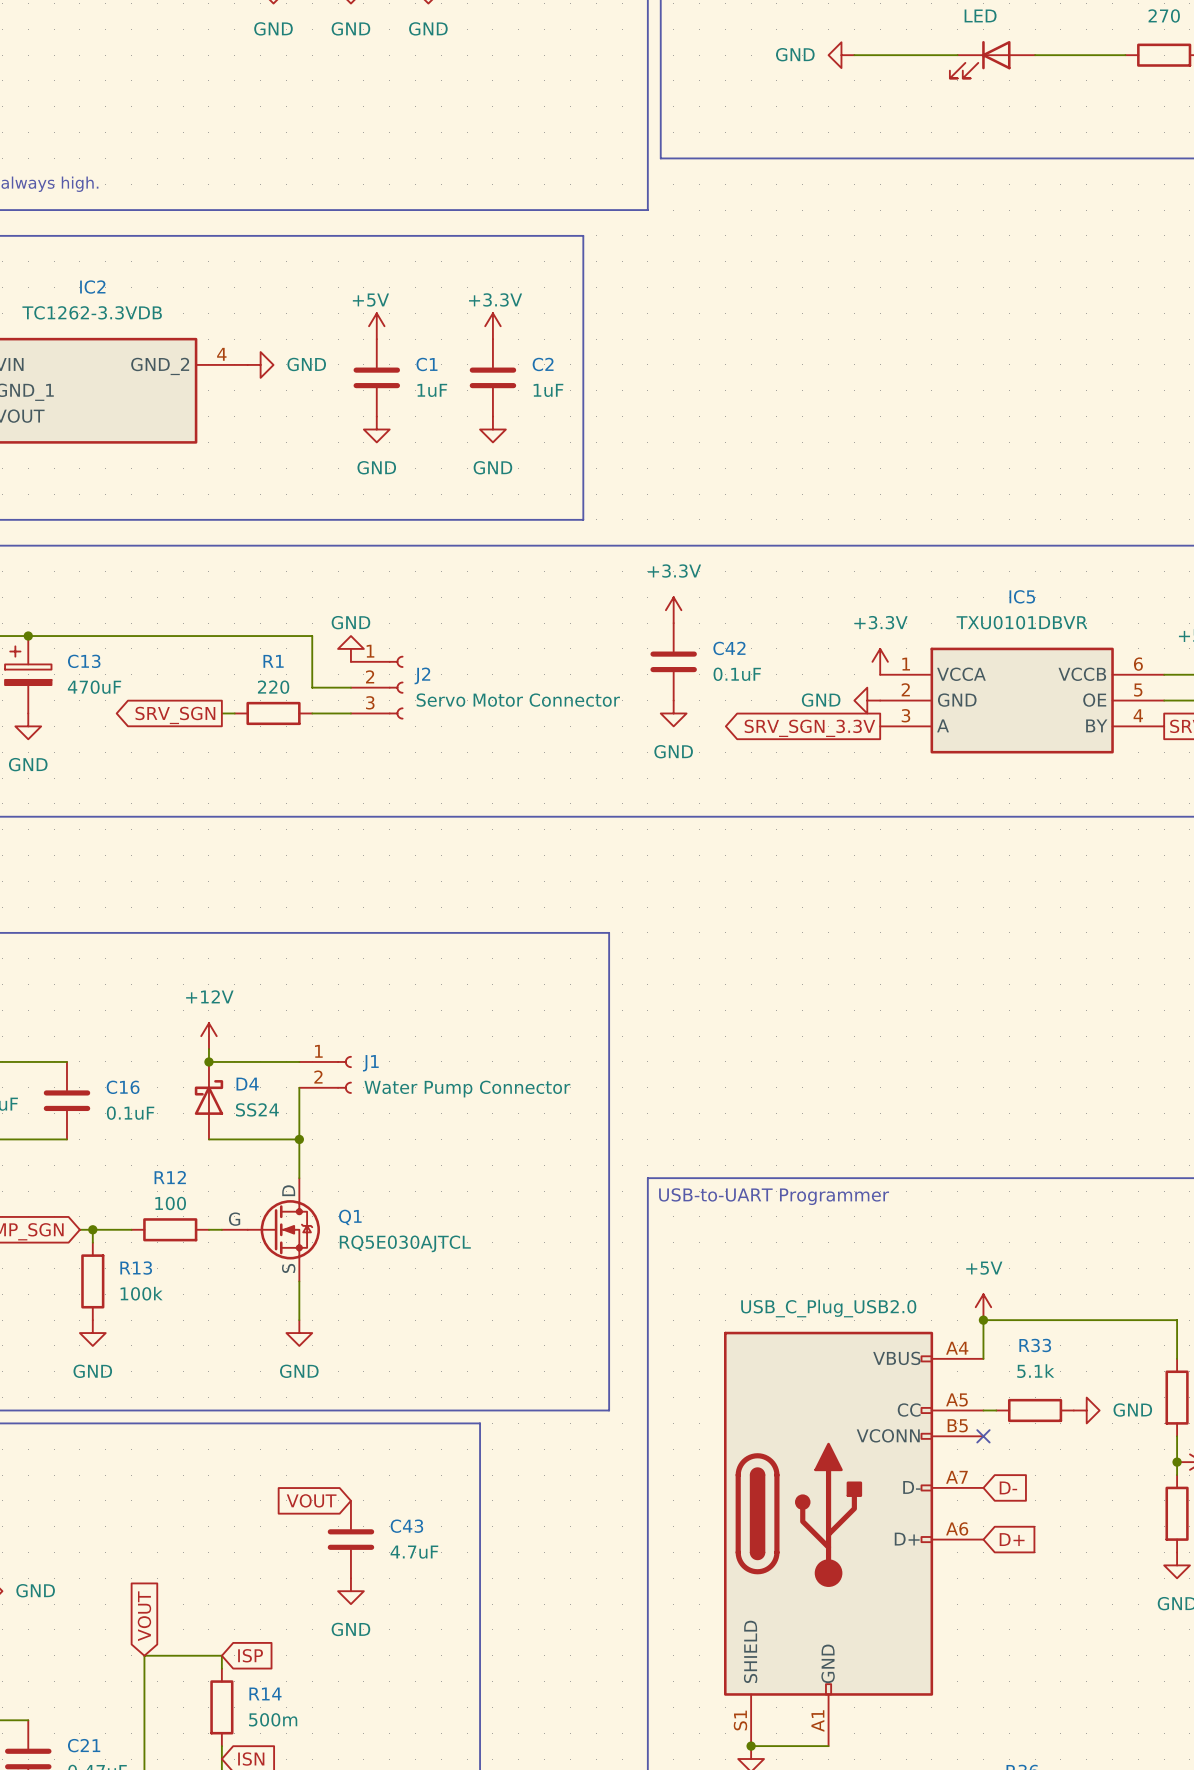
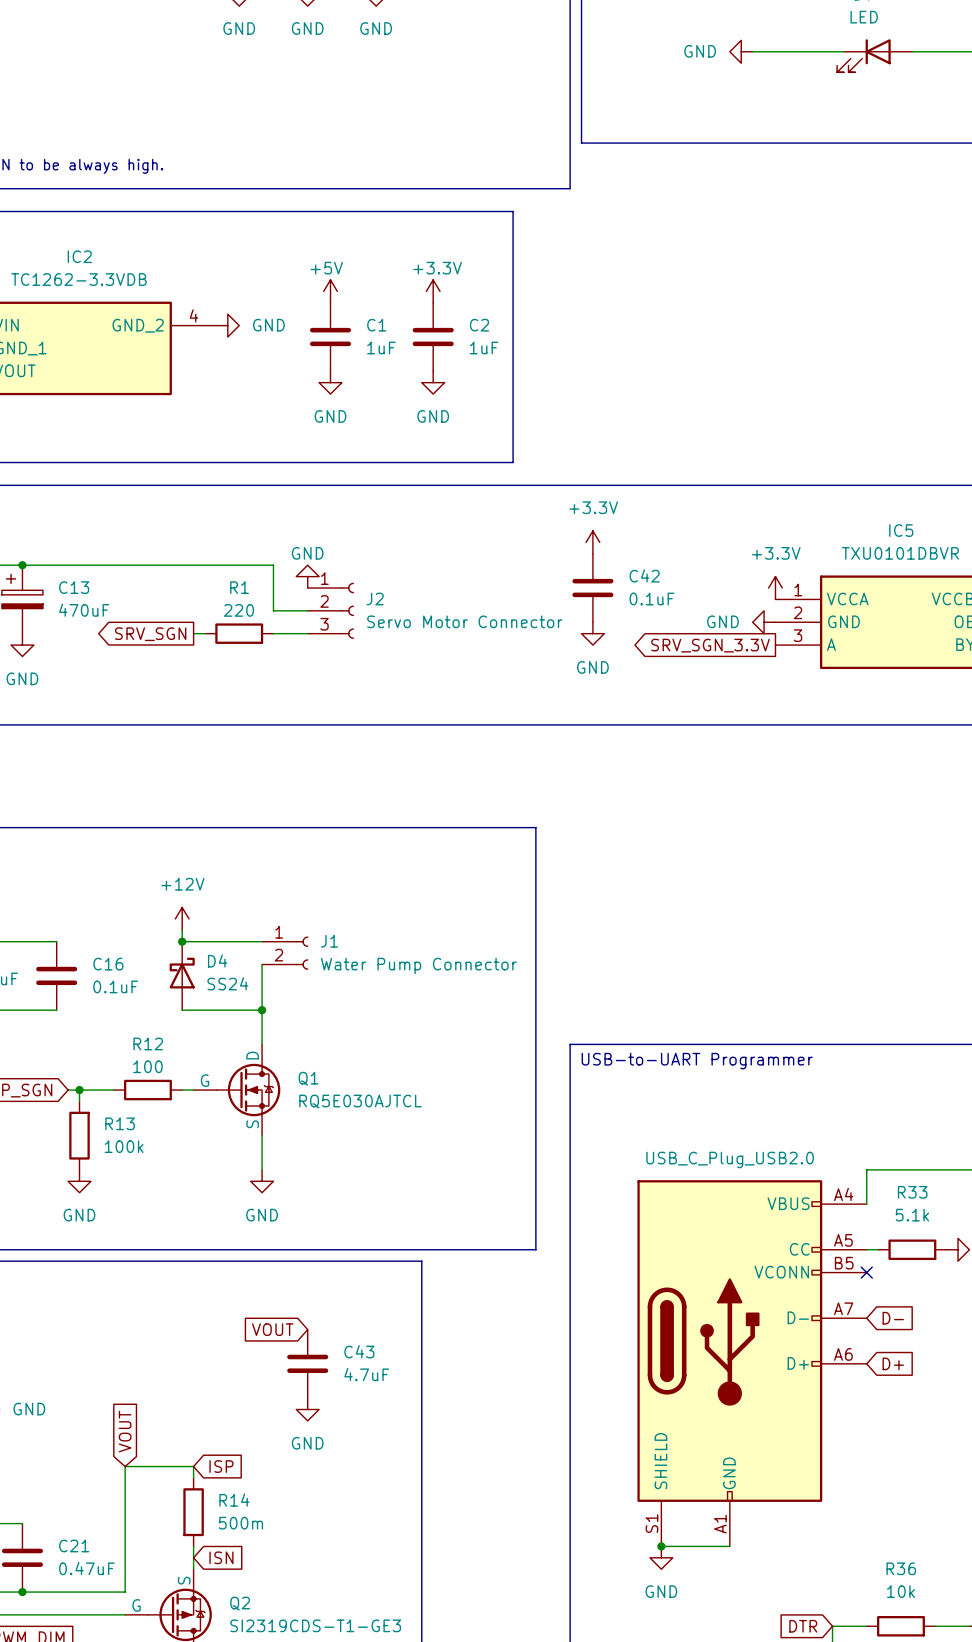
power symbol: +5V (983, 1307) -> none
junction: (983, 1320) -> none

